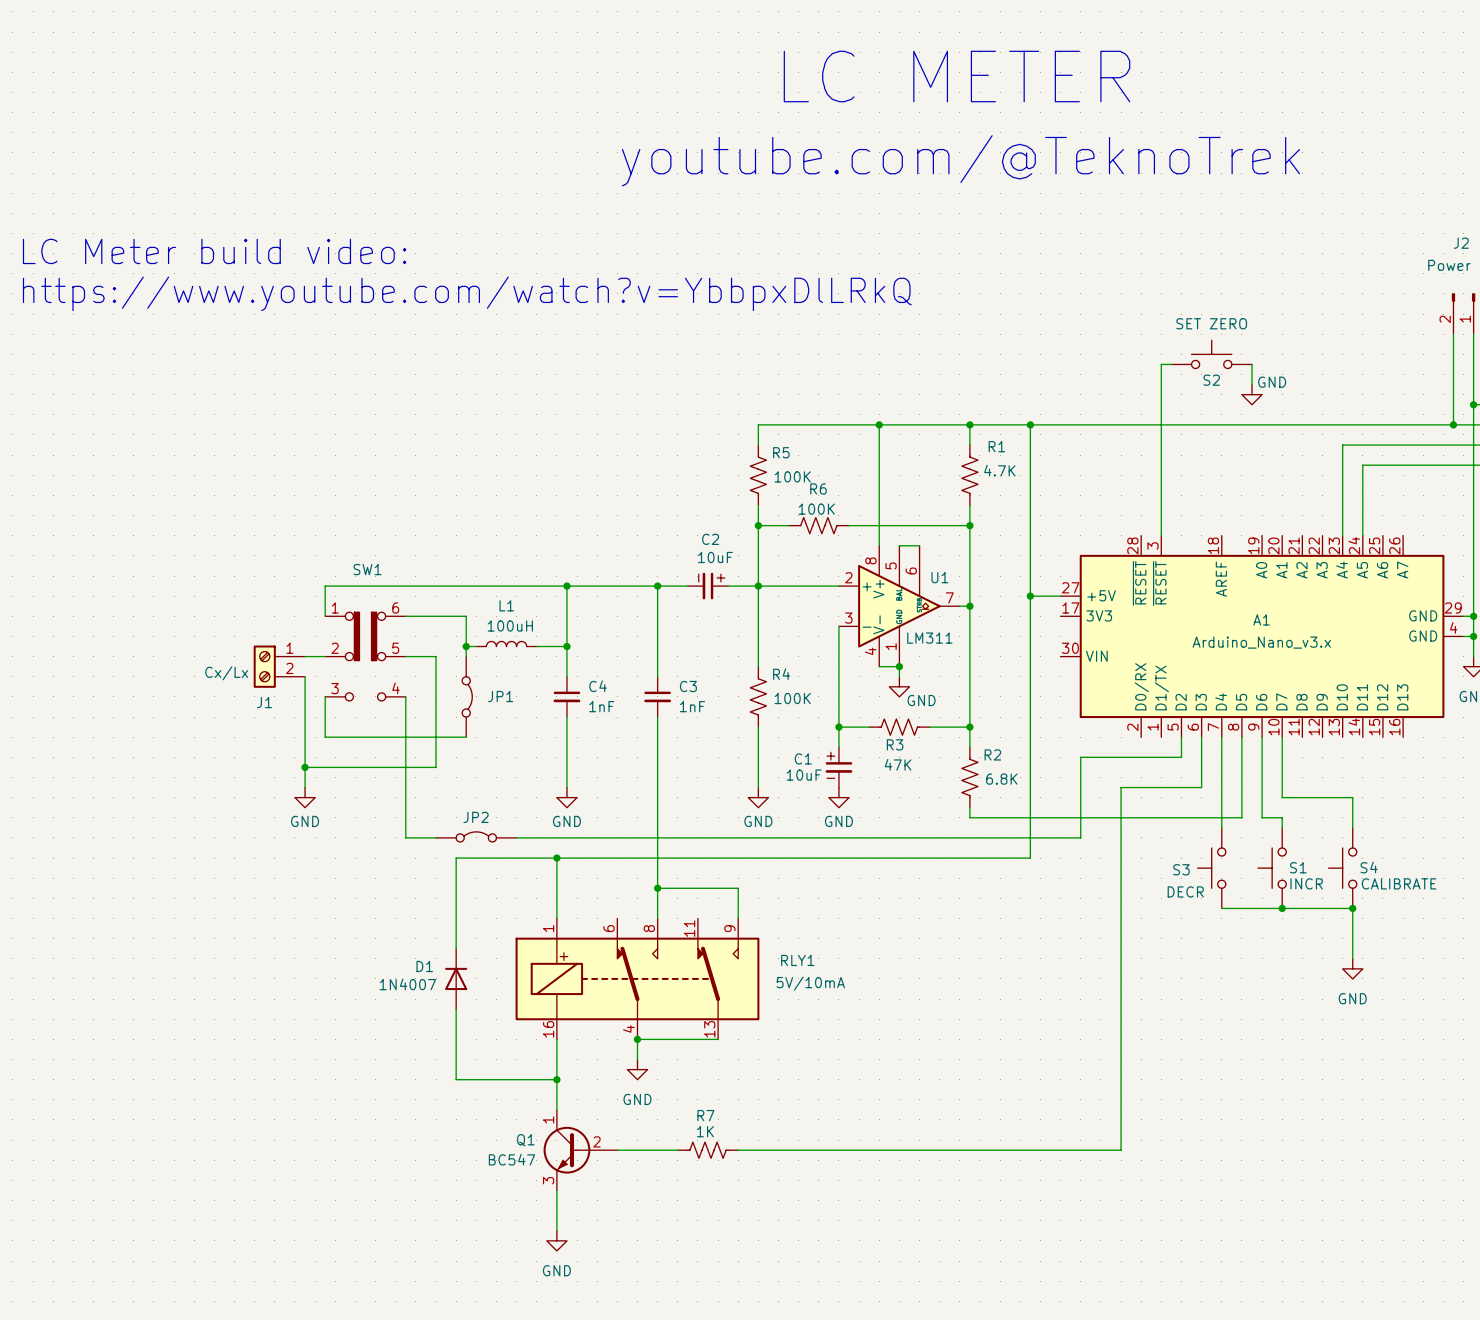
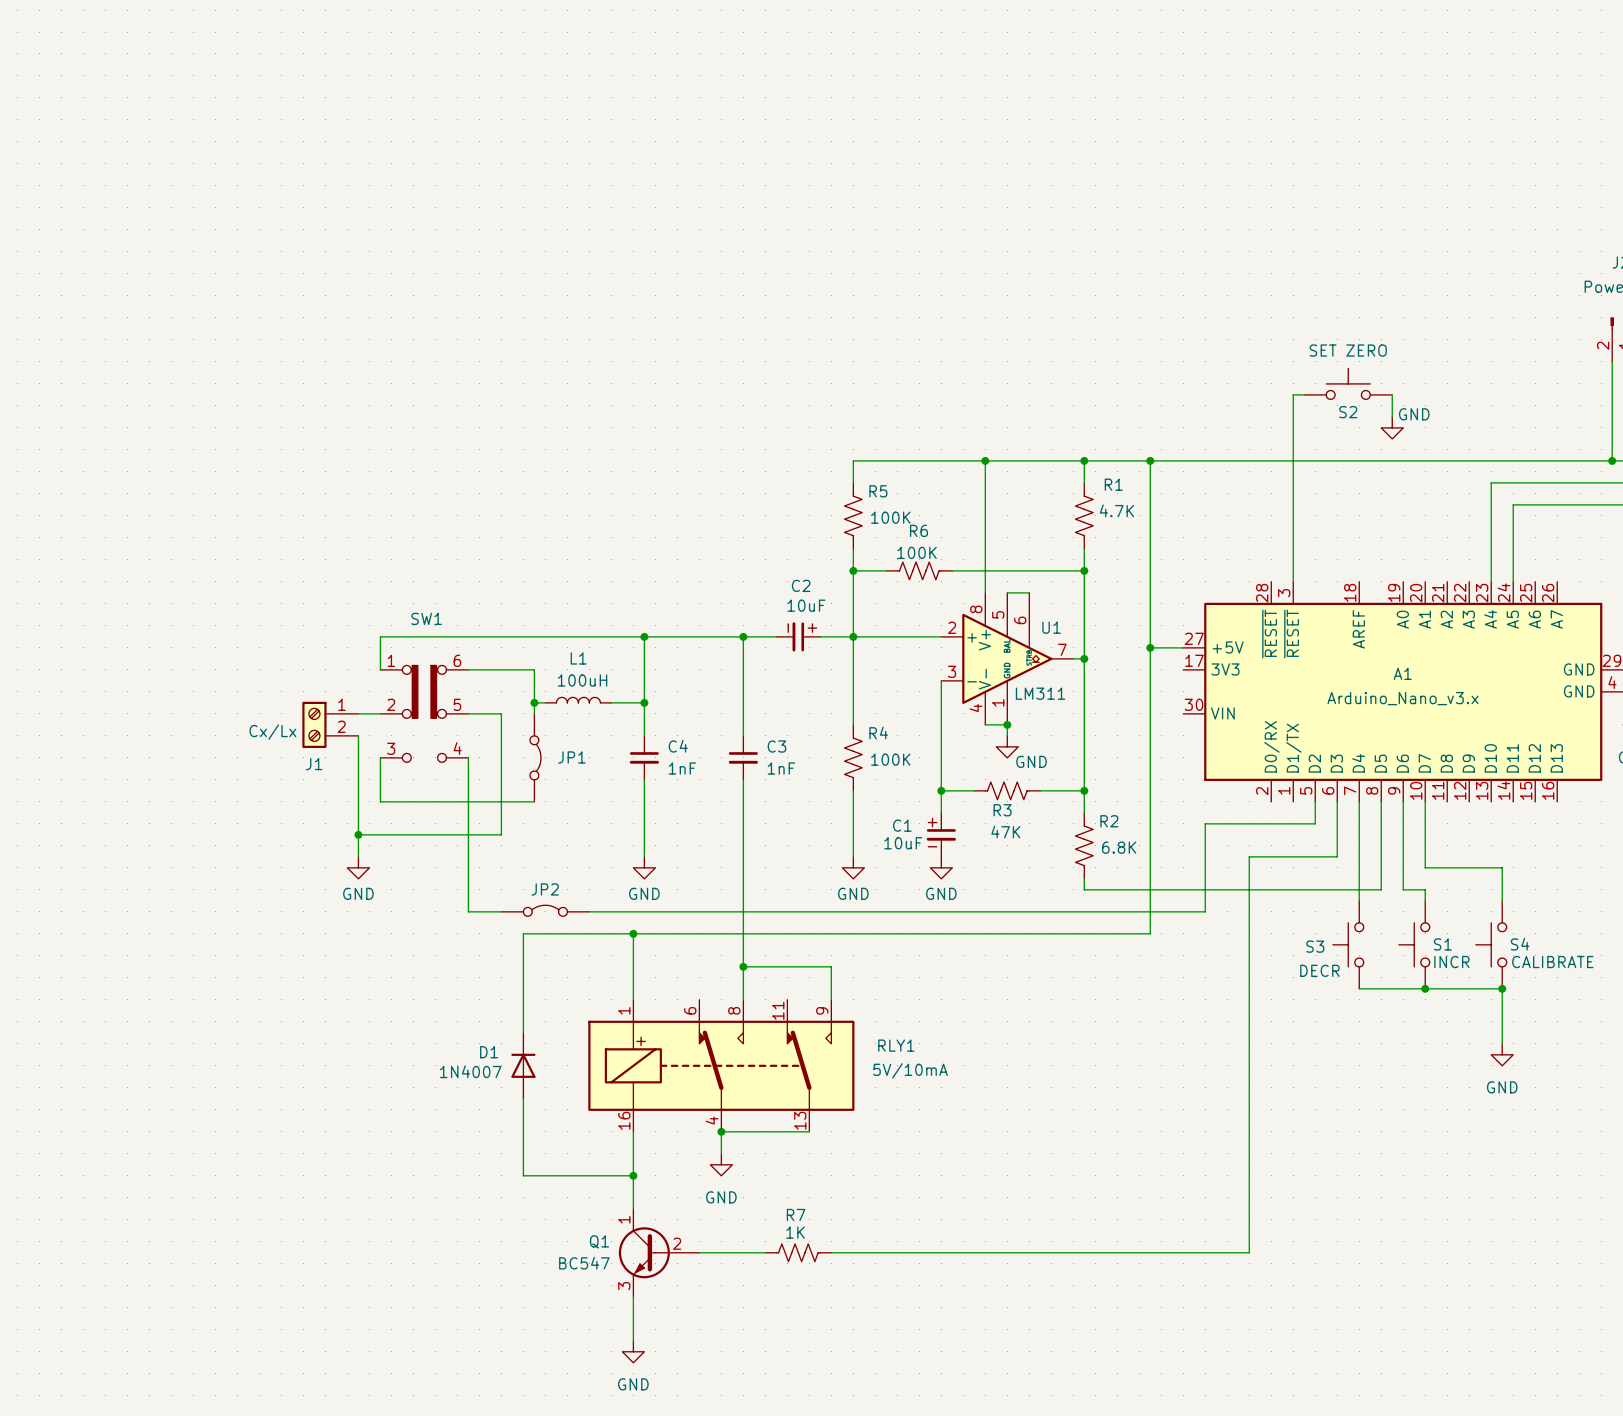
text: LC METER (957, 76) -> none
text: youtube.com/@TeknoTrek (961, 160) -> none
text: LC Meter build video: (214, 251) -> none
text: https://www.youtube.com/watch?v=YbbpxDlLRkQ (467, 293) -> none

